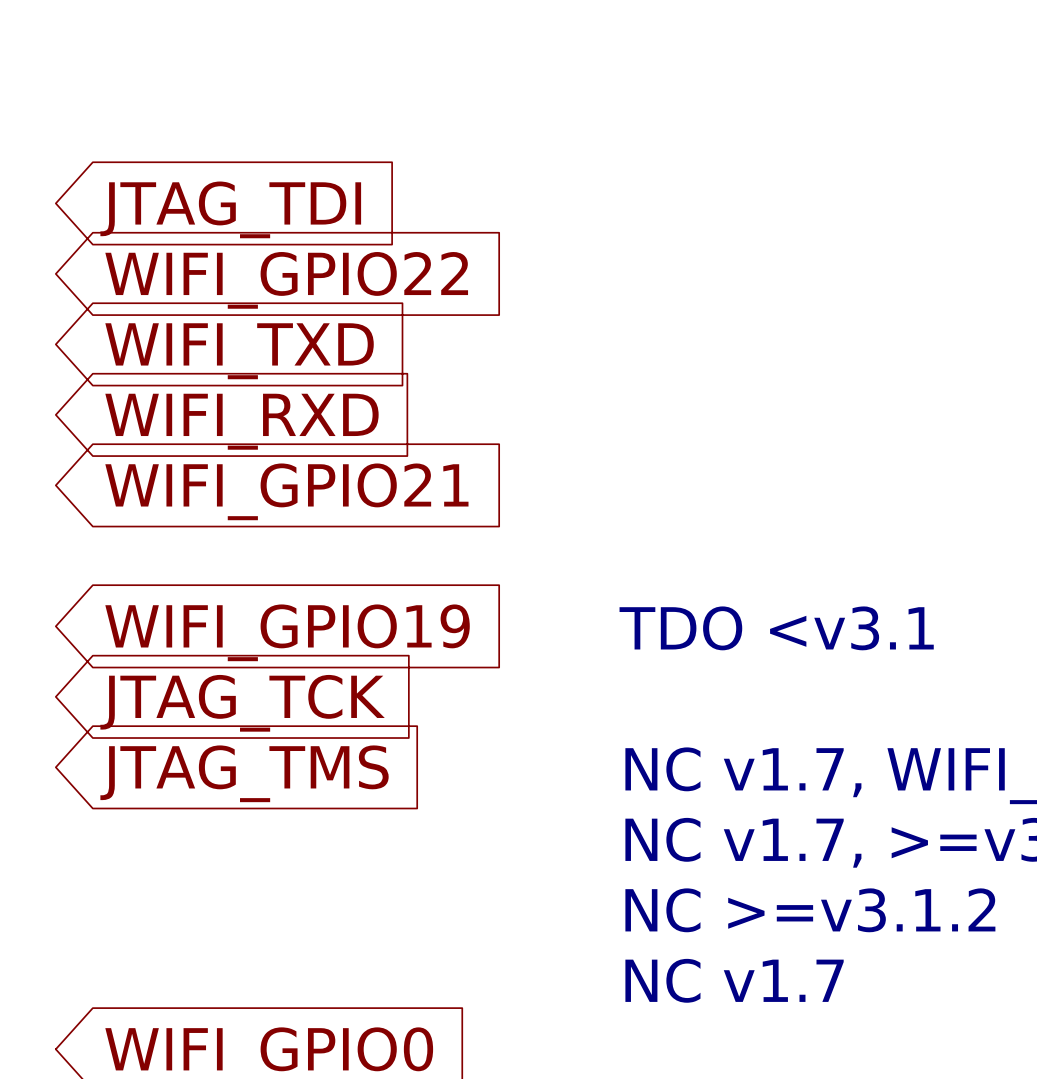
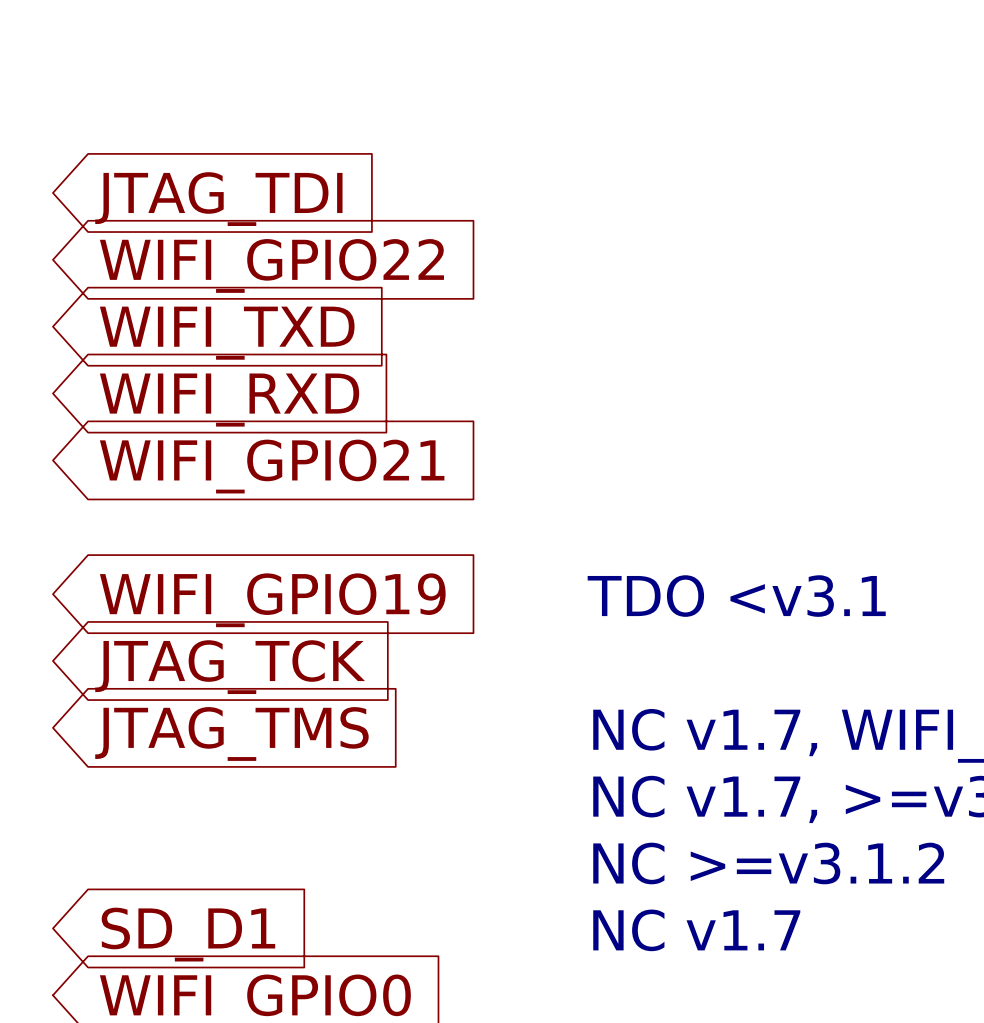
global label: none -> SD_D1 (188, 934)

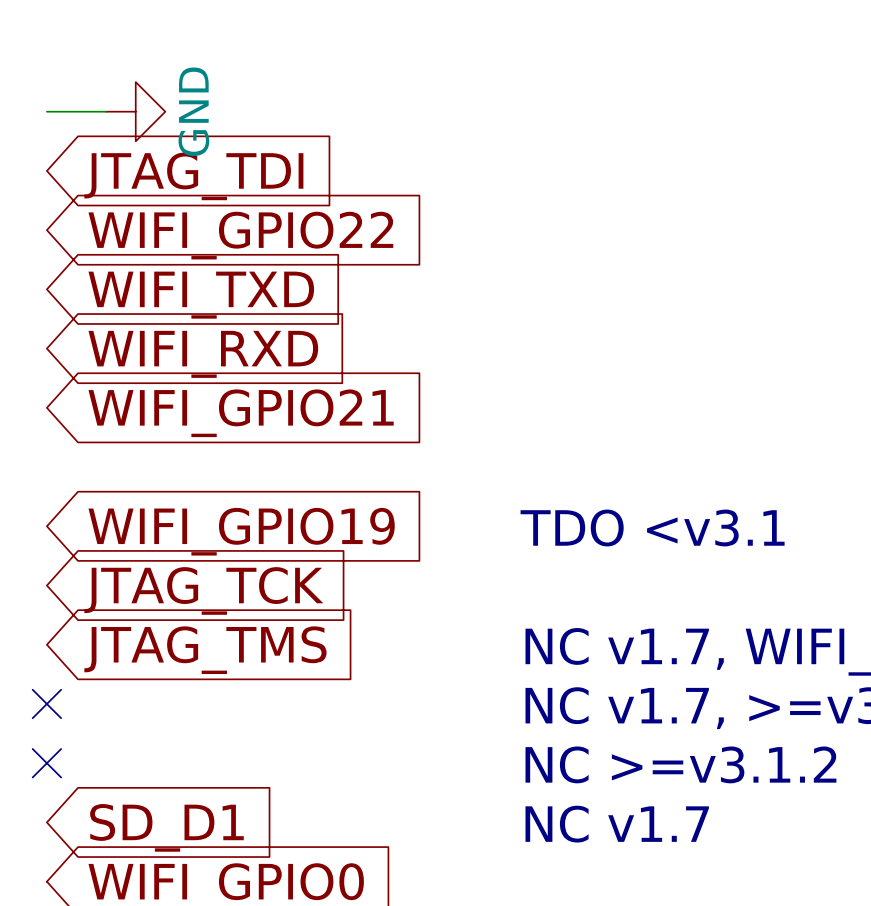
wire: none -> (46, 111) (106, 111)
power symbol: none -> GND (135, 111)
no-connect mark: none -> (46, 703)
no-connect mark: none -> (46, 763)

